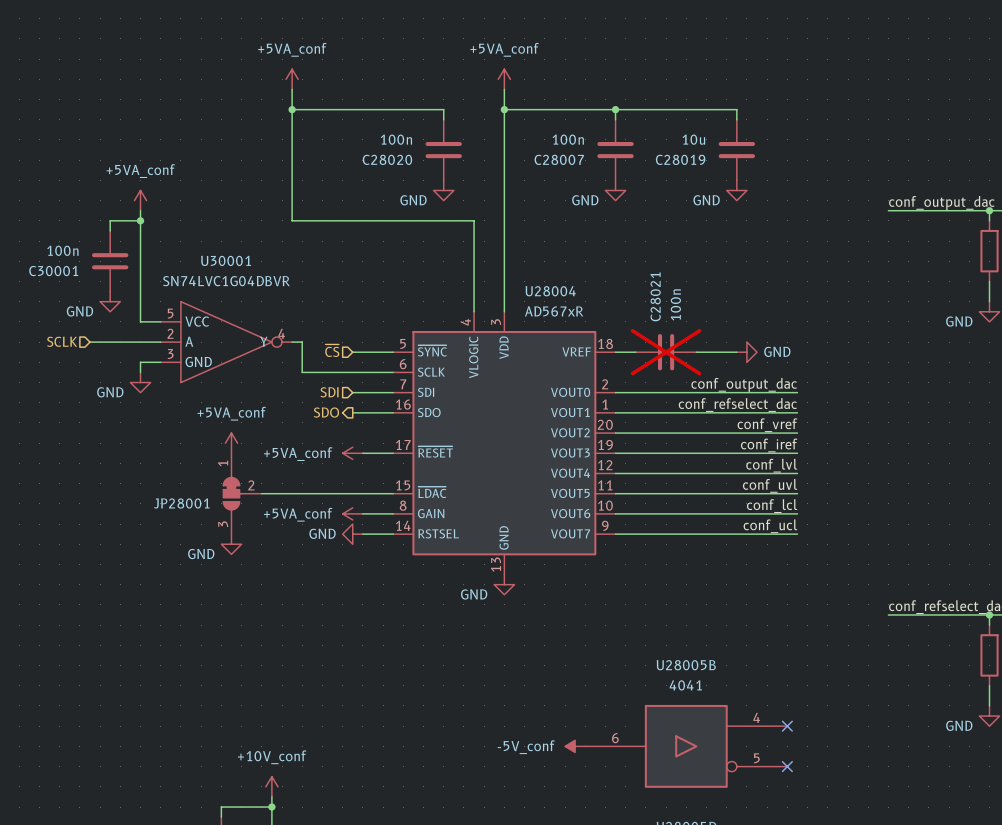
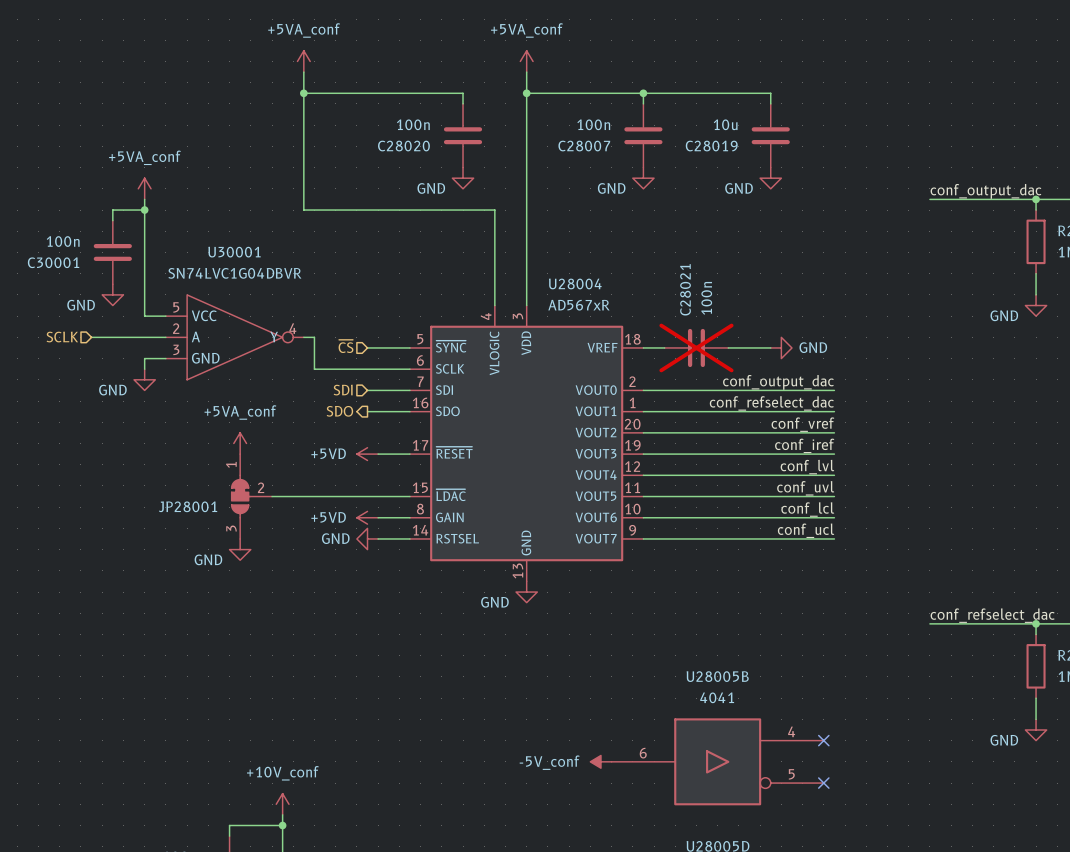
power symbol: +5VA_conf (352, 453) -> +5VD (367, 454)
power symbol: +5VA_conf (352, 513) -> +5VD (367, 517)

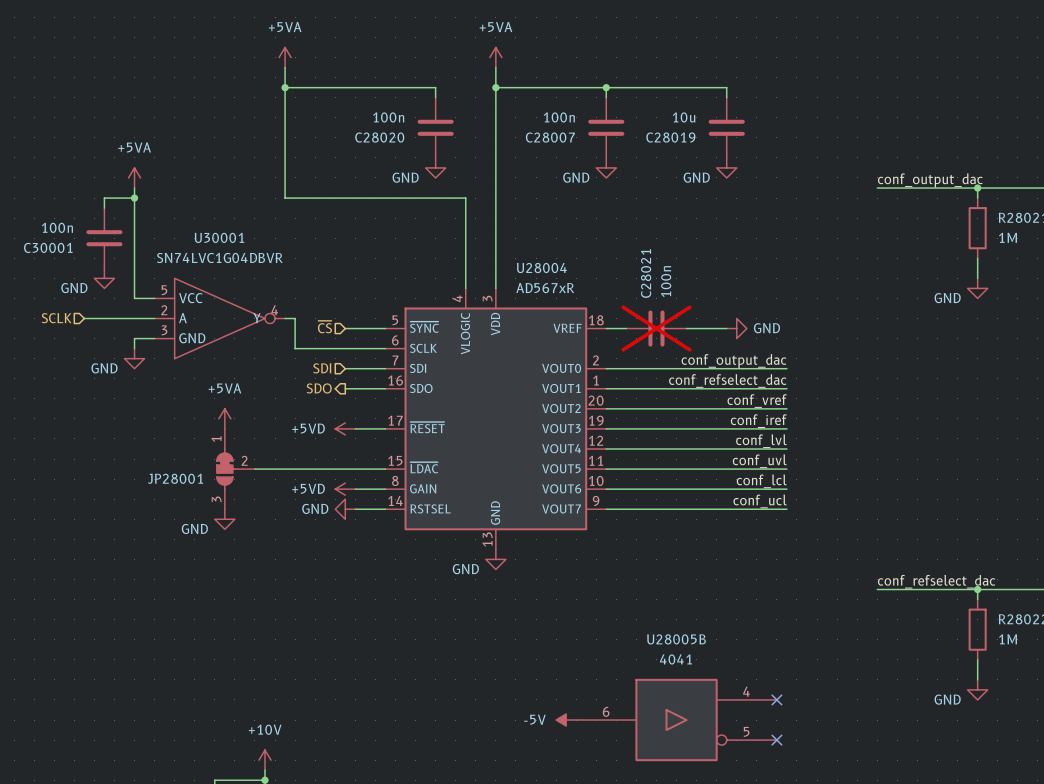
power symbol: +5VA_conf (303, 61) -> +5VA (285, 57)
power symbol: +5VA_conf (526, 61) -> +5VA (495, 57)
power symbol: +5VA_conf (144, 188) -> +5VA (134, 177)
power symbol: +5VA_conf (240, 443) -> +5VA (224, 418)
power symbol: -5V_conf (600, 761) -> -5V (566, 720)
power symbol: +10V_conf (282, 804) -> +10V (265, 760)

